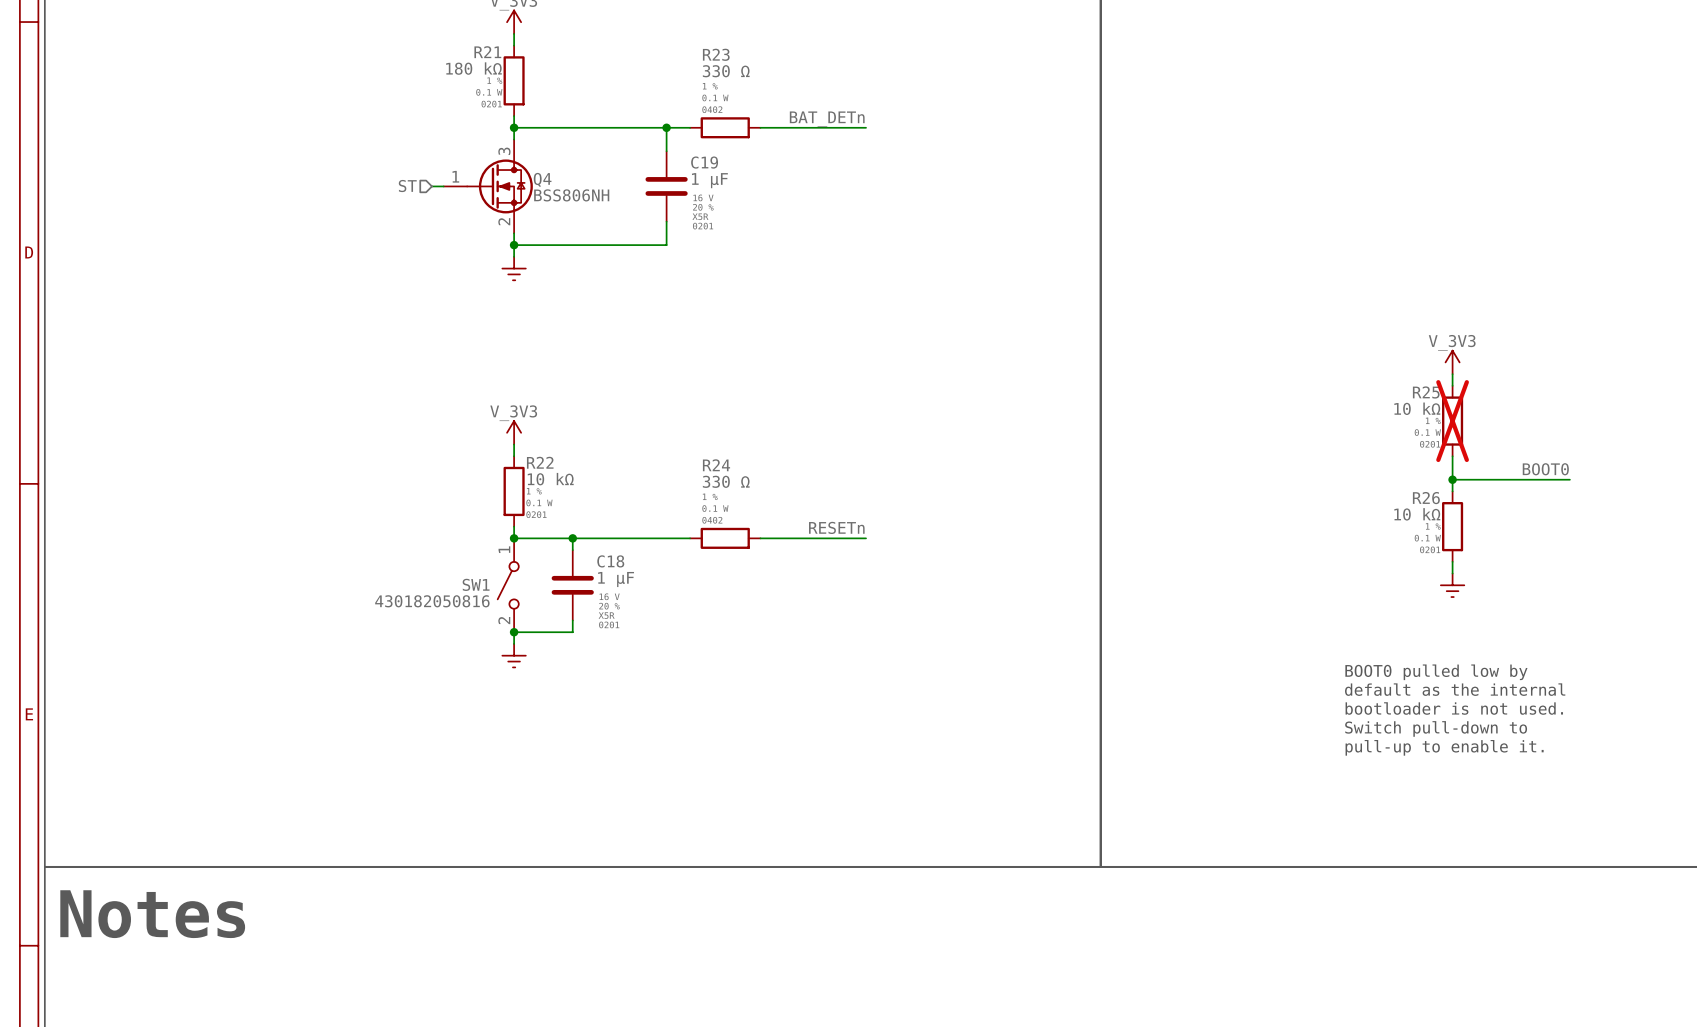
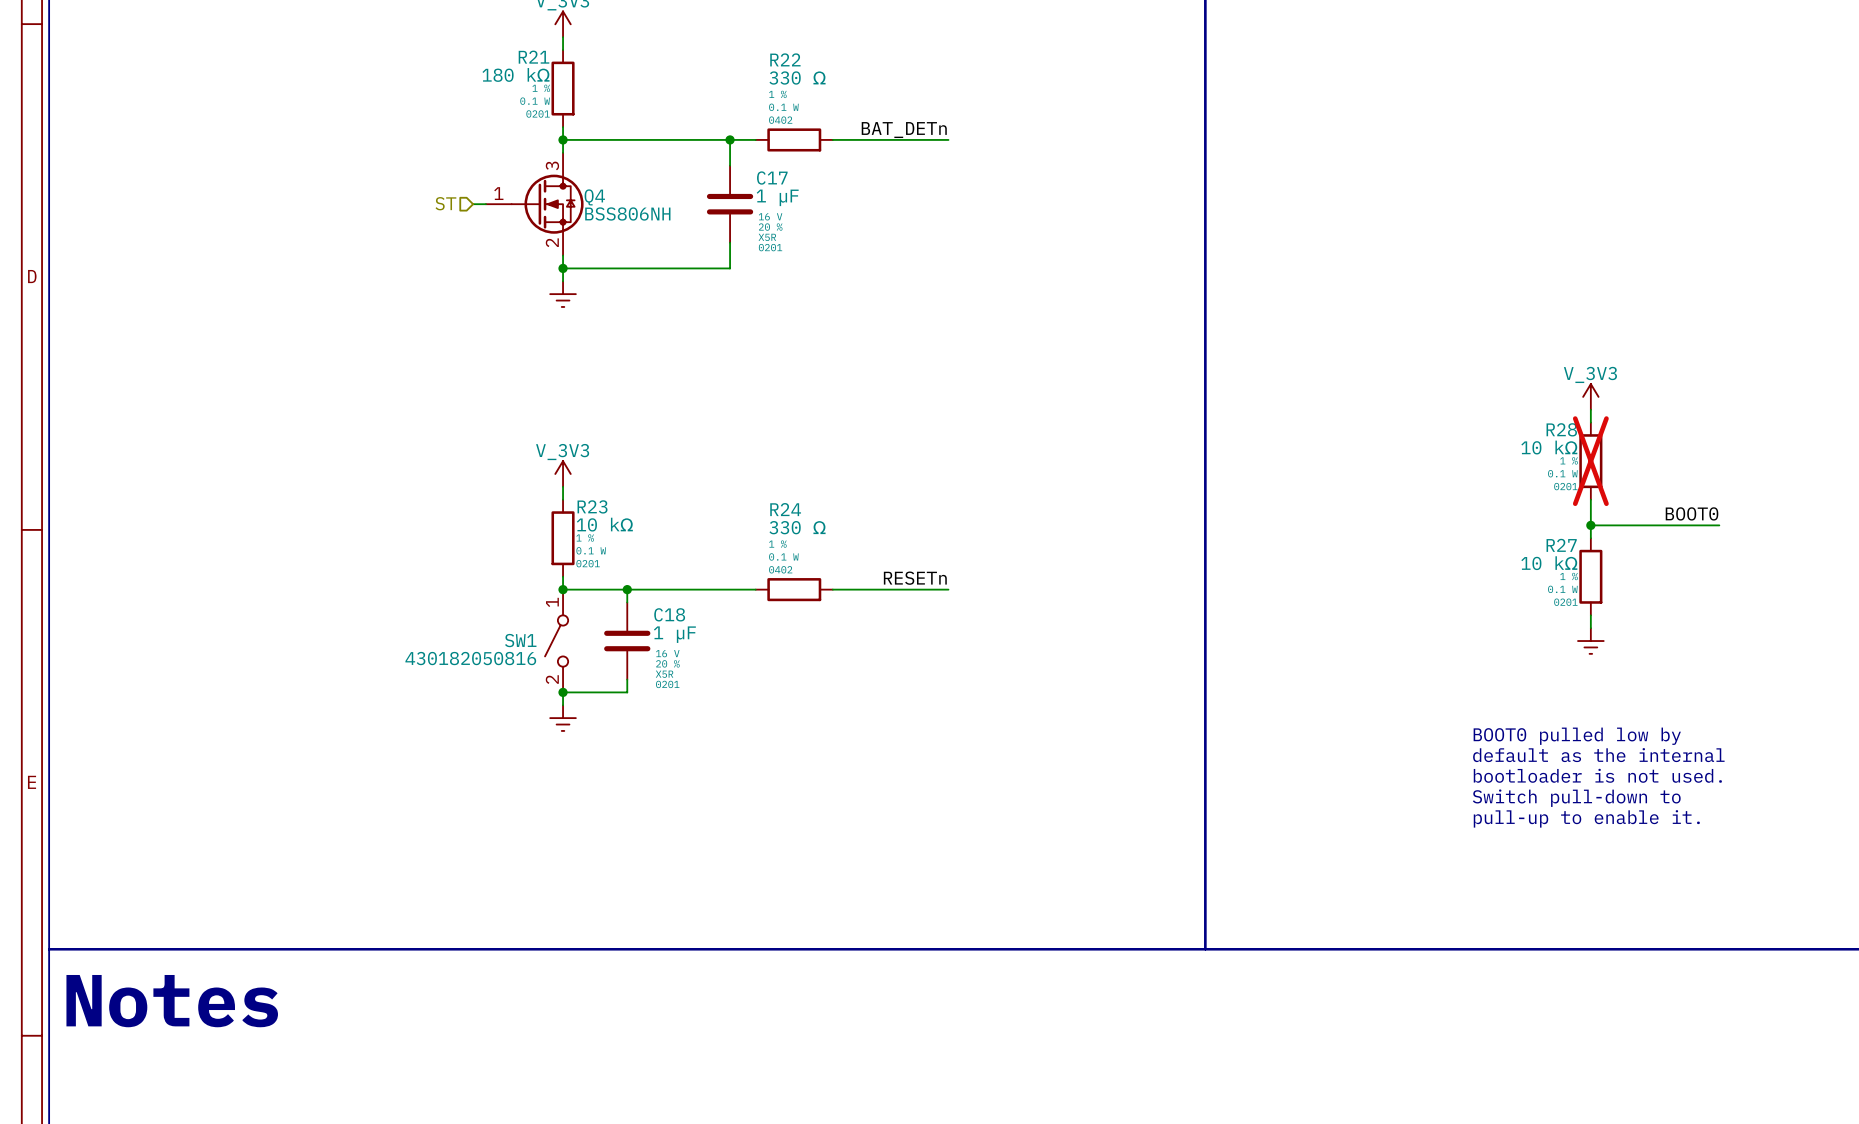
R23 name: R23 (716, 54) -> R22 (785, 59)
C19 name: C19 (704, 162) -> C17 (772, 178)
R25 name: R25 (1426, 392) -> R28 (1561, 429)
R22 name: R22 (540, 462) -> R23 (592, 506)
R26 name: R26 (1426, 498) -> R27 (1561, 545)

